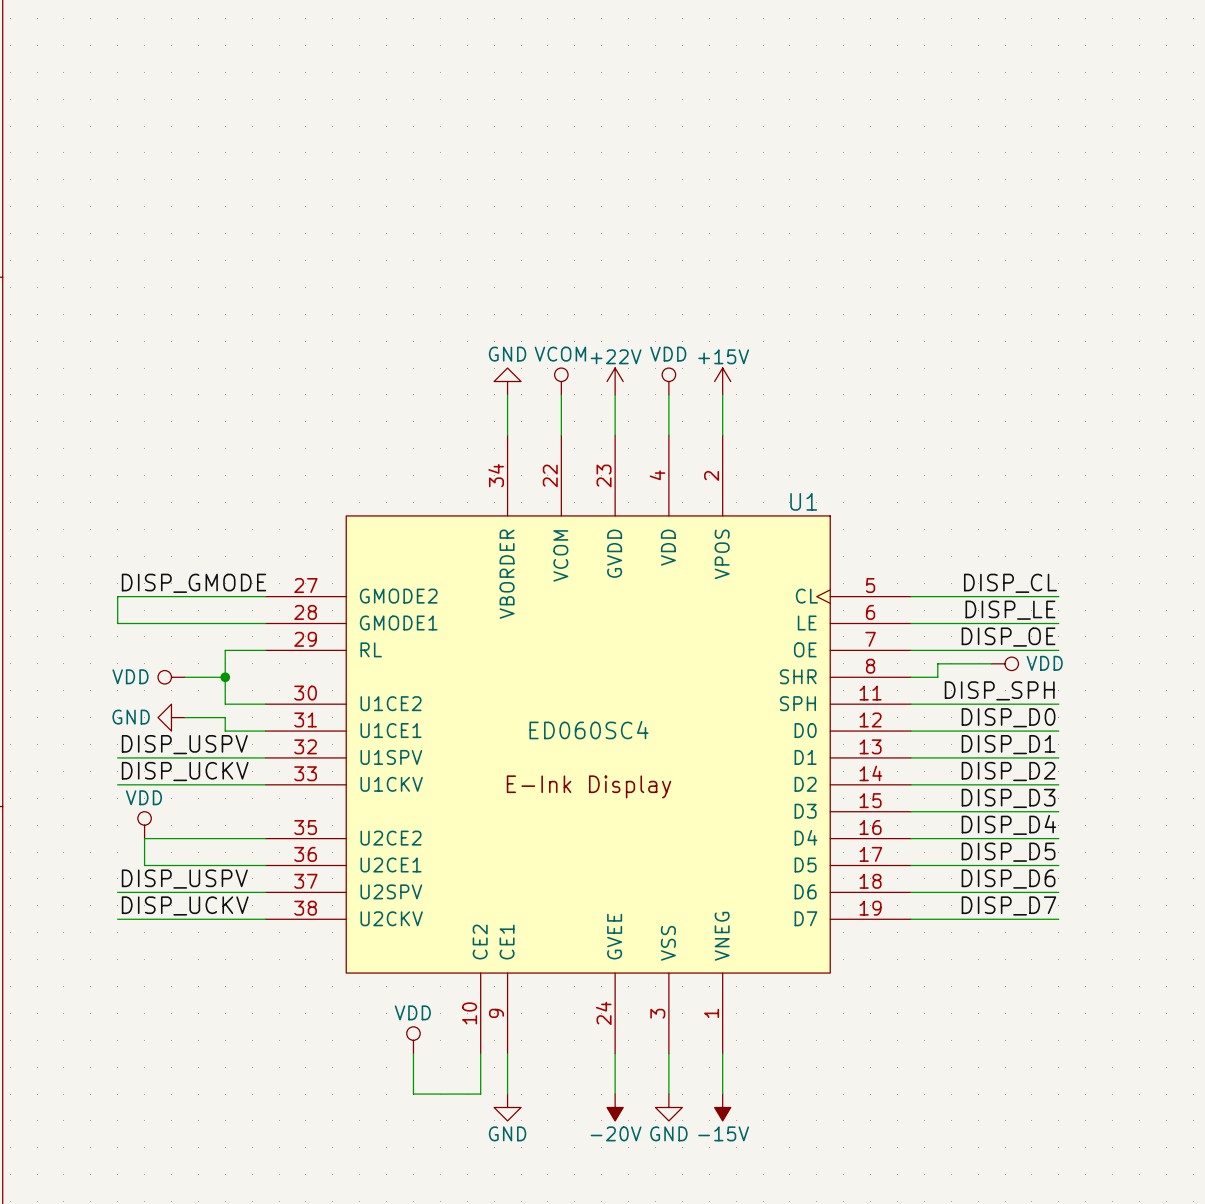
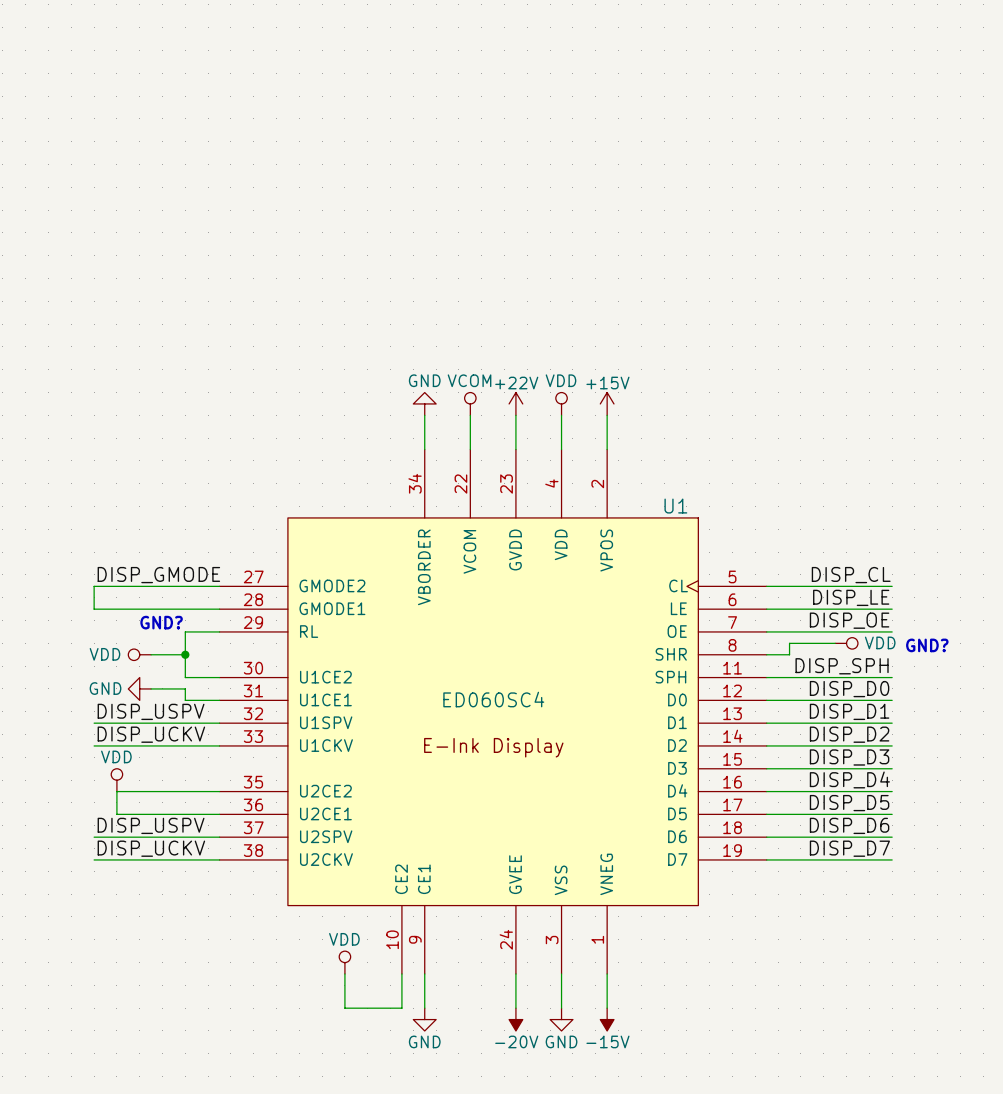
text: none -> GND? (161, 622)
text: none -> GND? (927, 645)

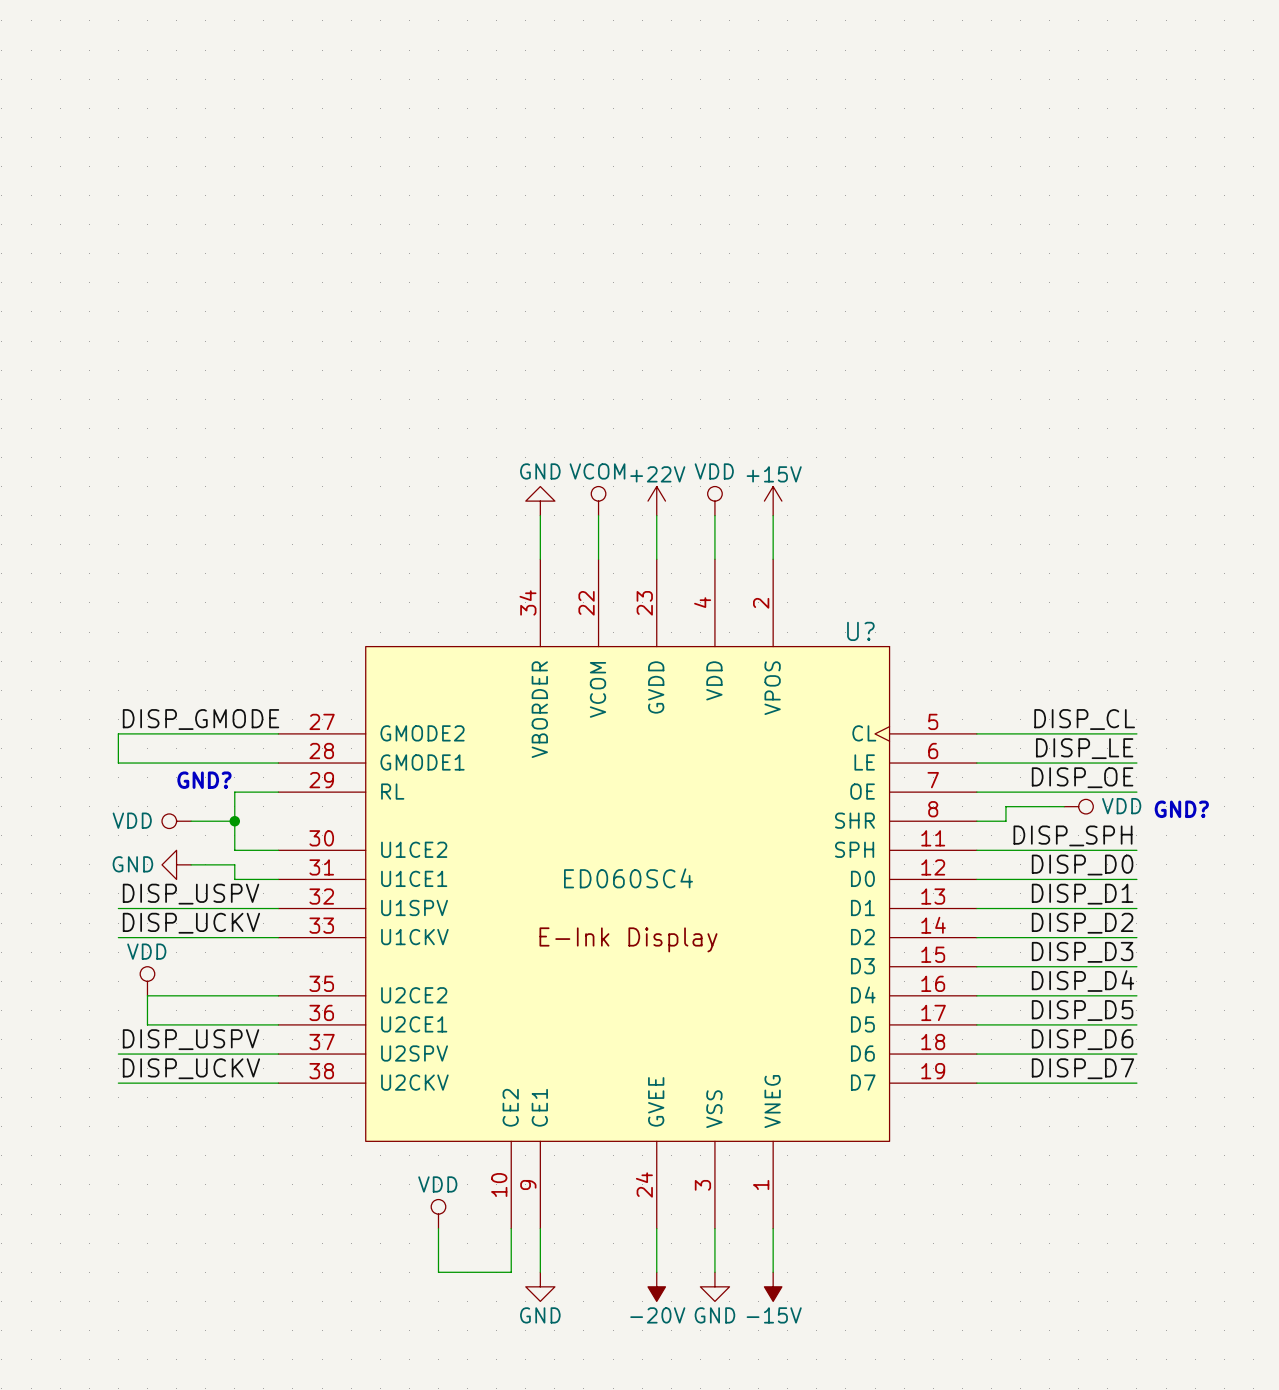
U1 name: U1 (675, 506) -> U? (860, 631)

